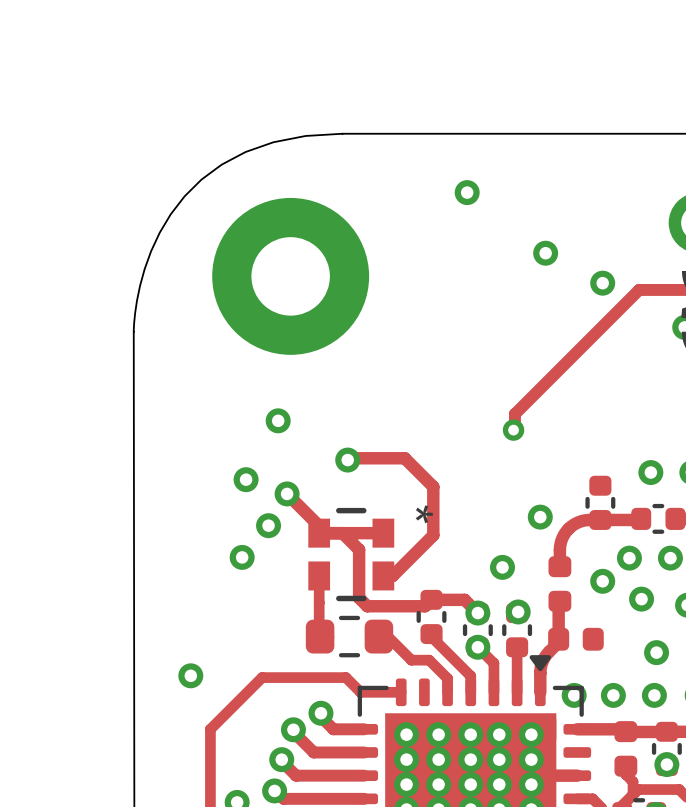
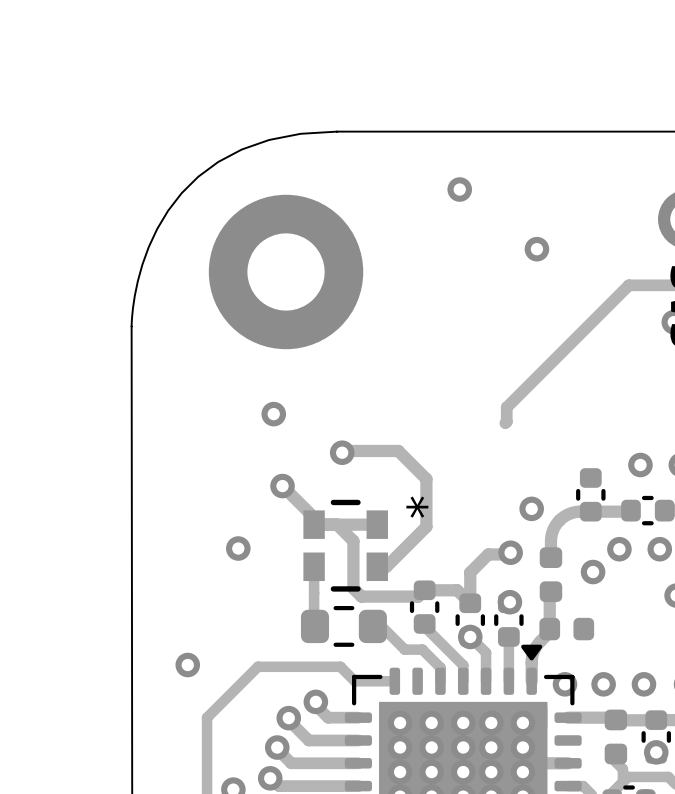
via: (602, 283) -> none
via: (513, 430) -> none
via: (246, 479) -> none
via: (268, 525) -> none
track: none -> (510, 552) (508, 554) (488, 554) (470, 572) (470, 603)
via position: (502, 567) -> (510, 552)
via: (641, 599) -> none
via: (477, 613) -> none
via: (656, 652) -> none

